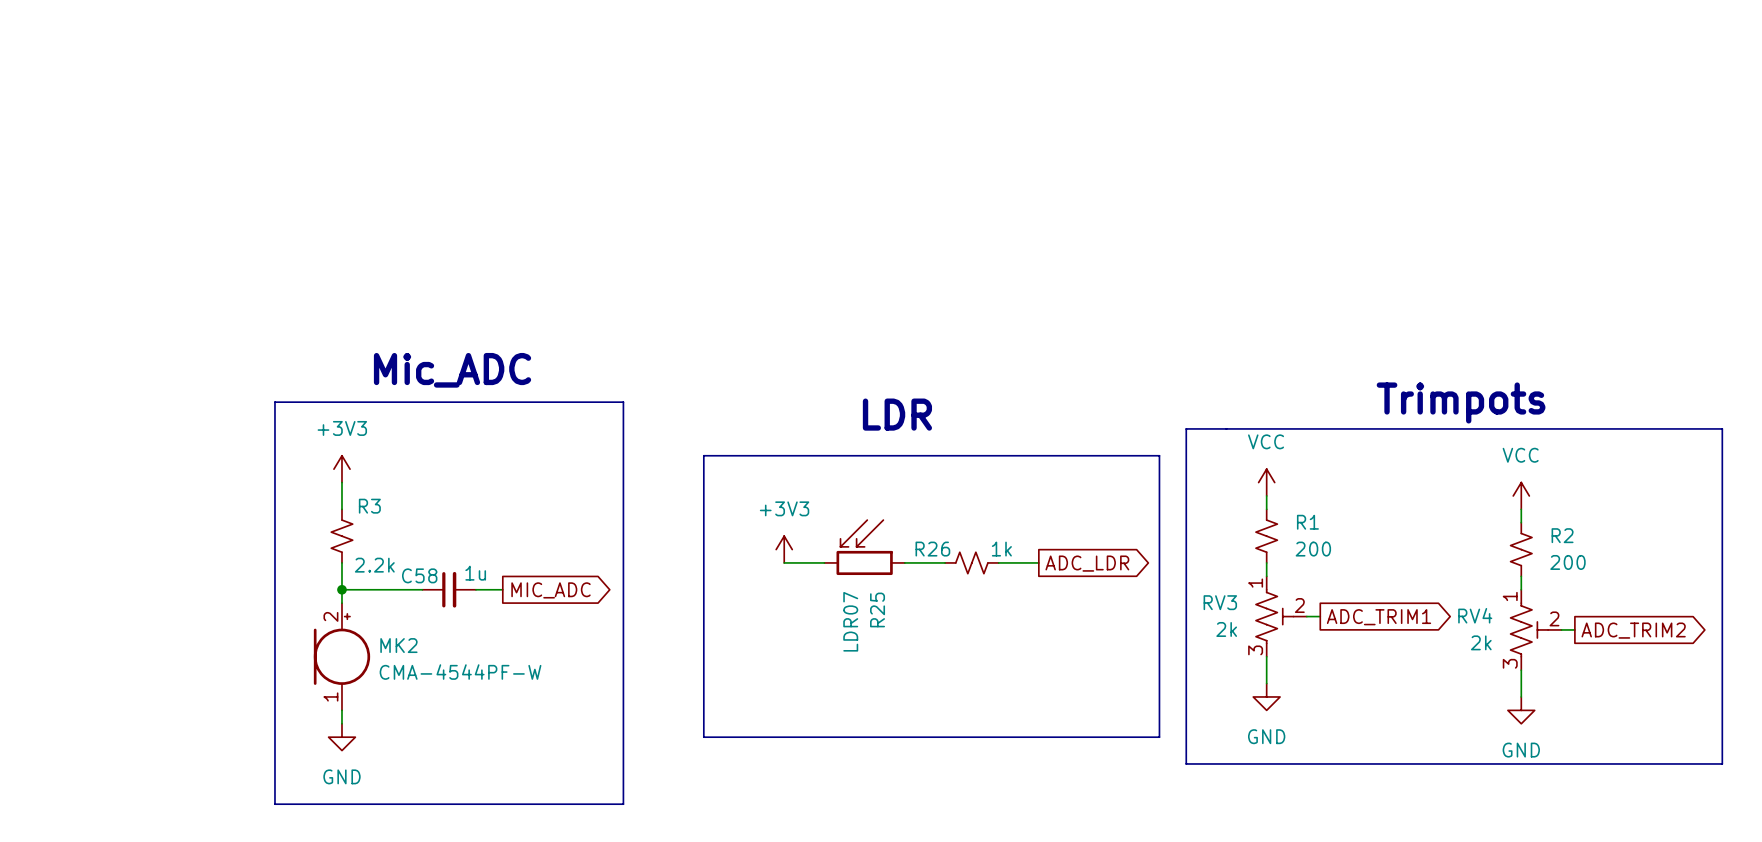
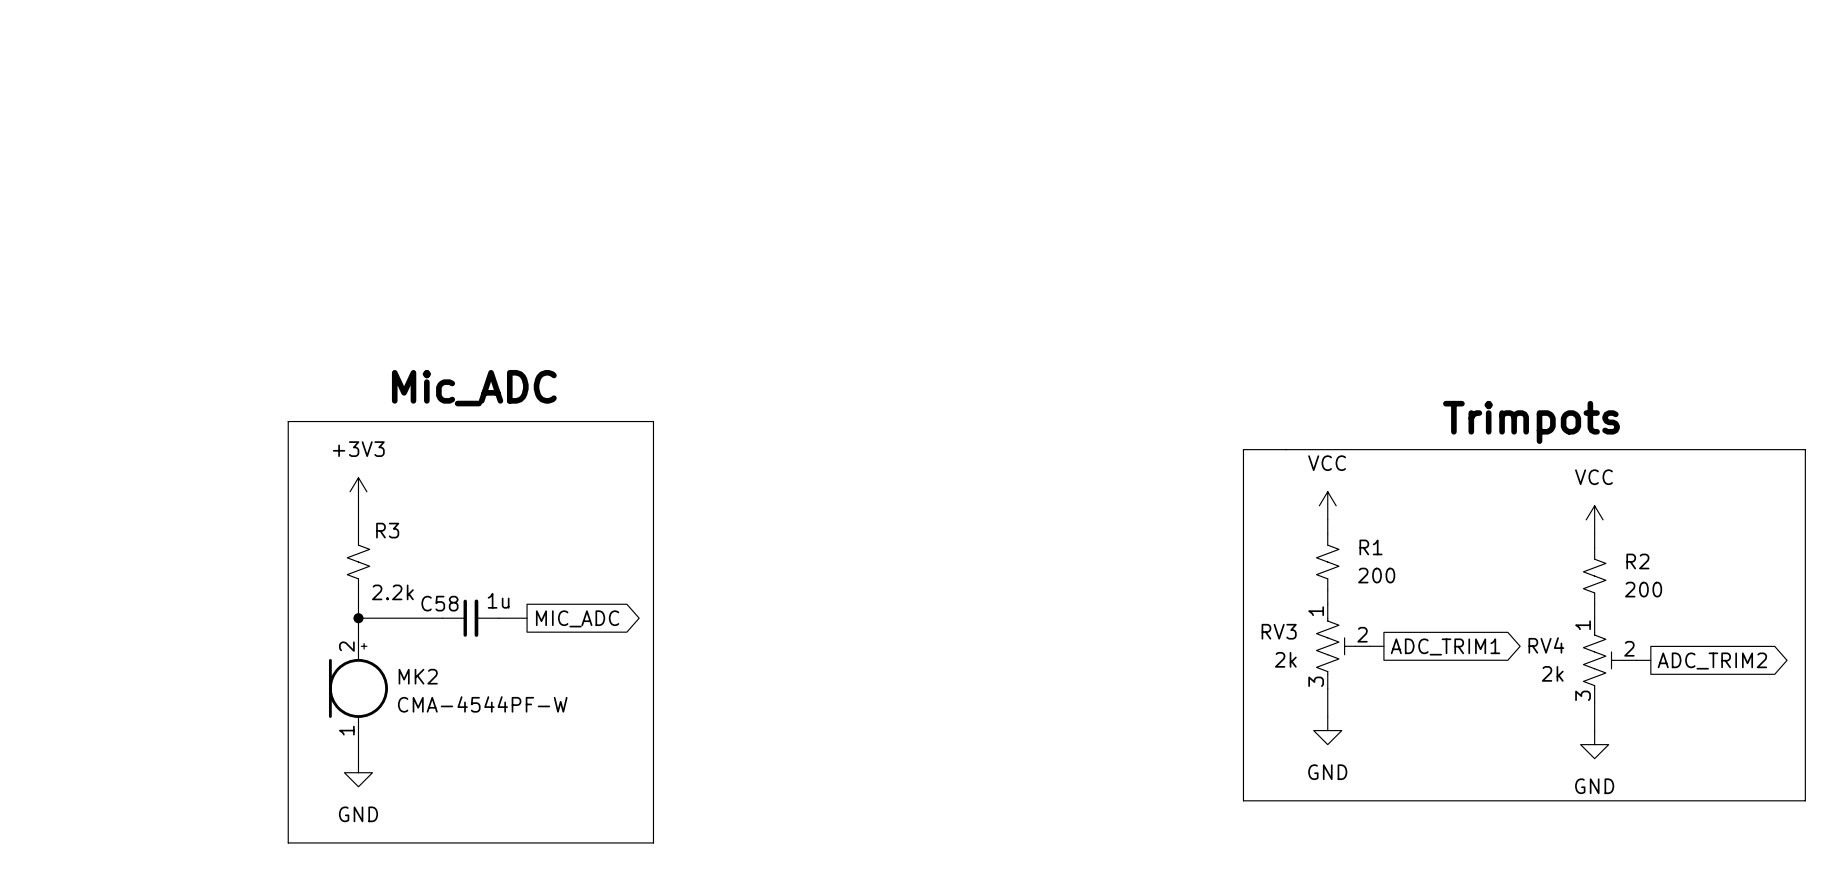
text: LDR (897, 414) -> none
line: (703, 455) (1159, 455) (1159, 737) (703, 737) (703, 455) -> none
R25: LDR07 (864, 547) -> none
power symbol: +3V3 (784, 549) -> none
wire: (784, 562) (824, 562) -> none
wire: (904, 562) (945, 562) -> none
R26: 1k (971, 562) -> none
wire: (998, 562) (1038, 562) -> none
global label: ADC_LDR (1087, 563) -> none

